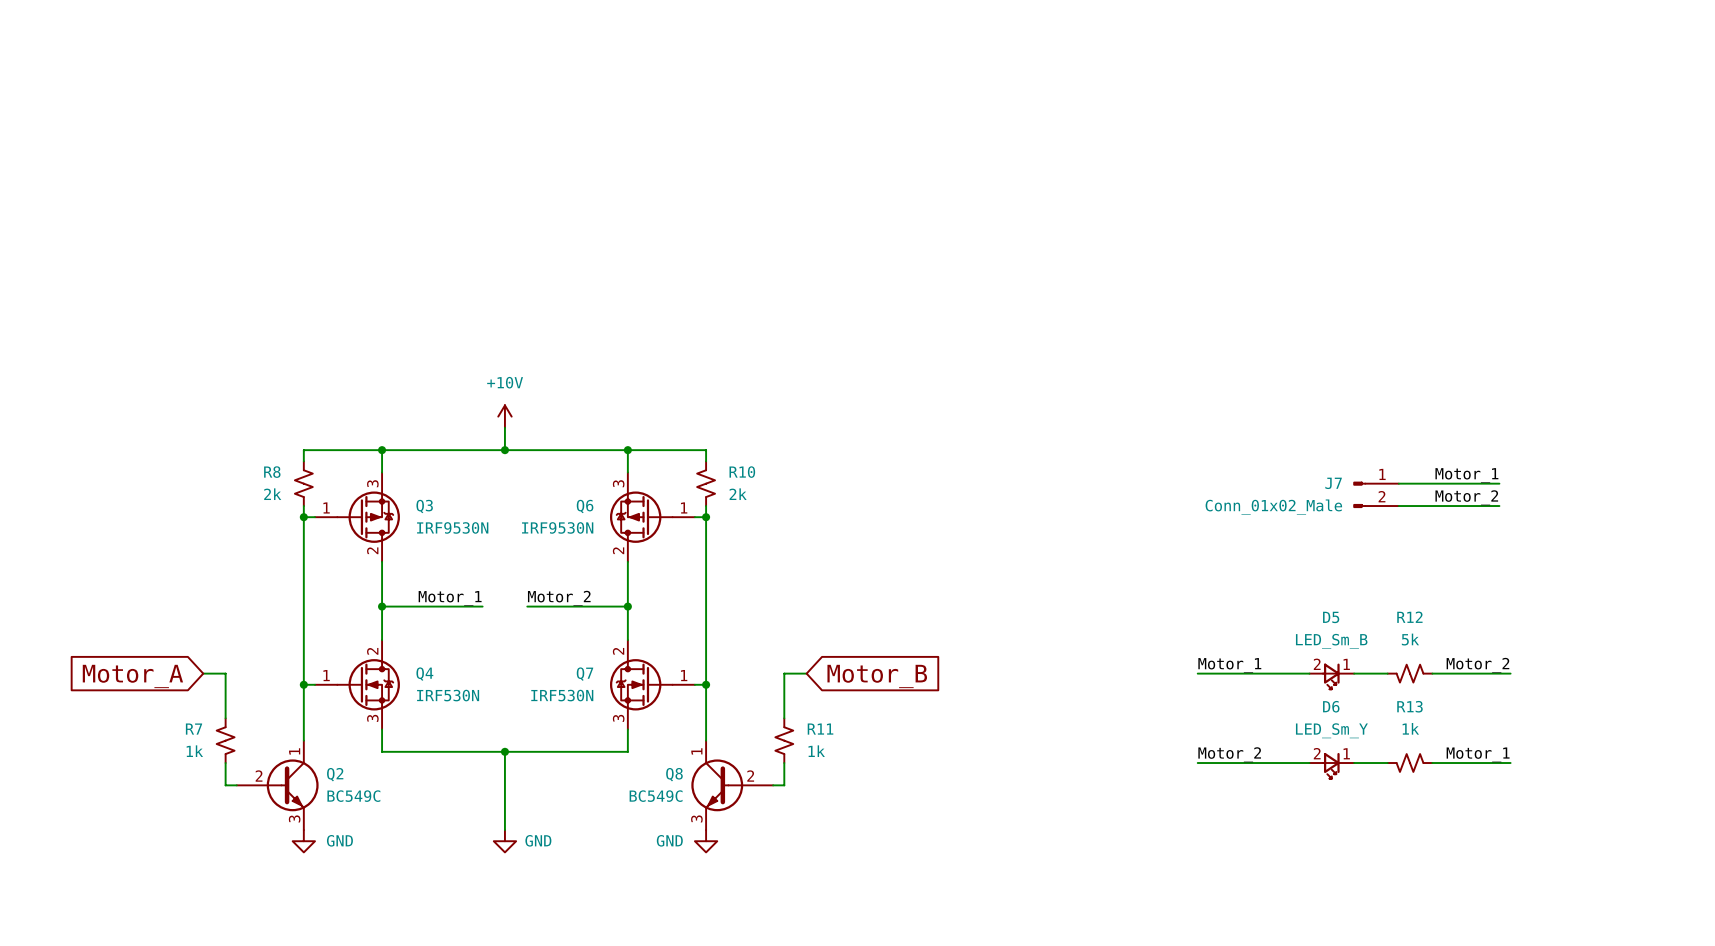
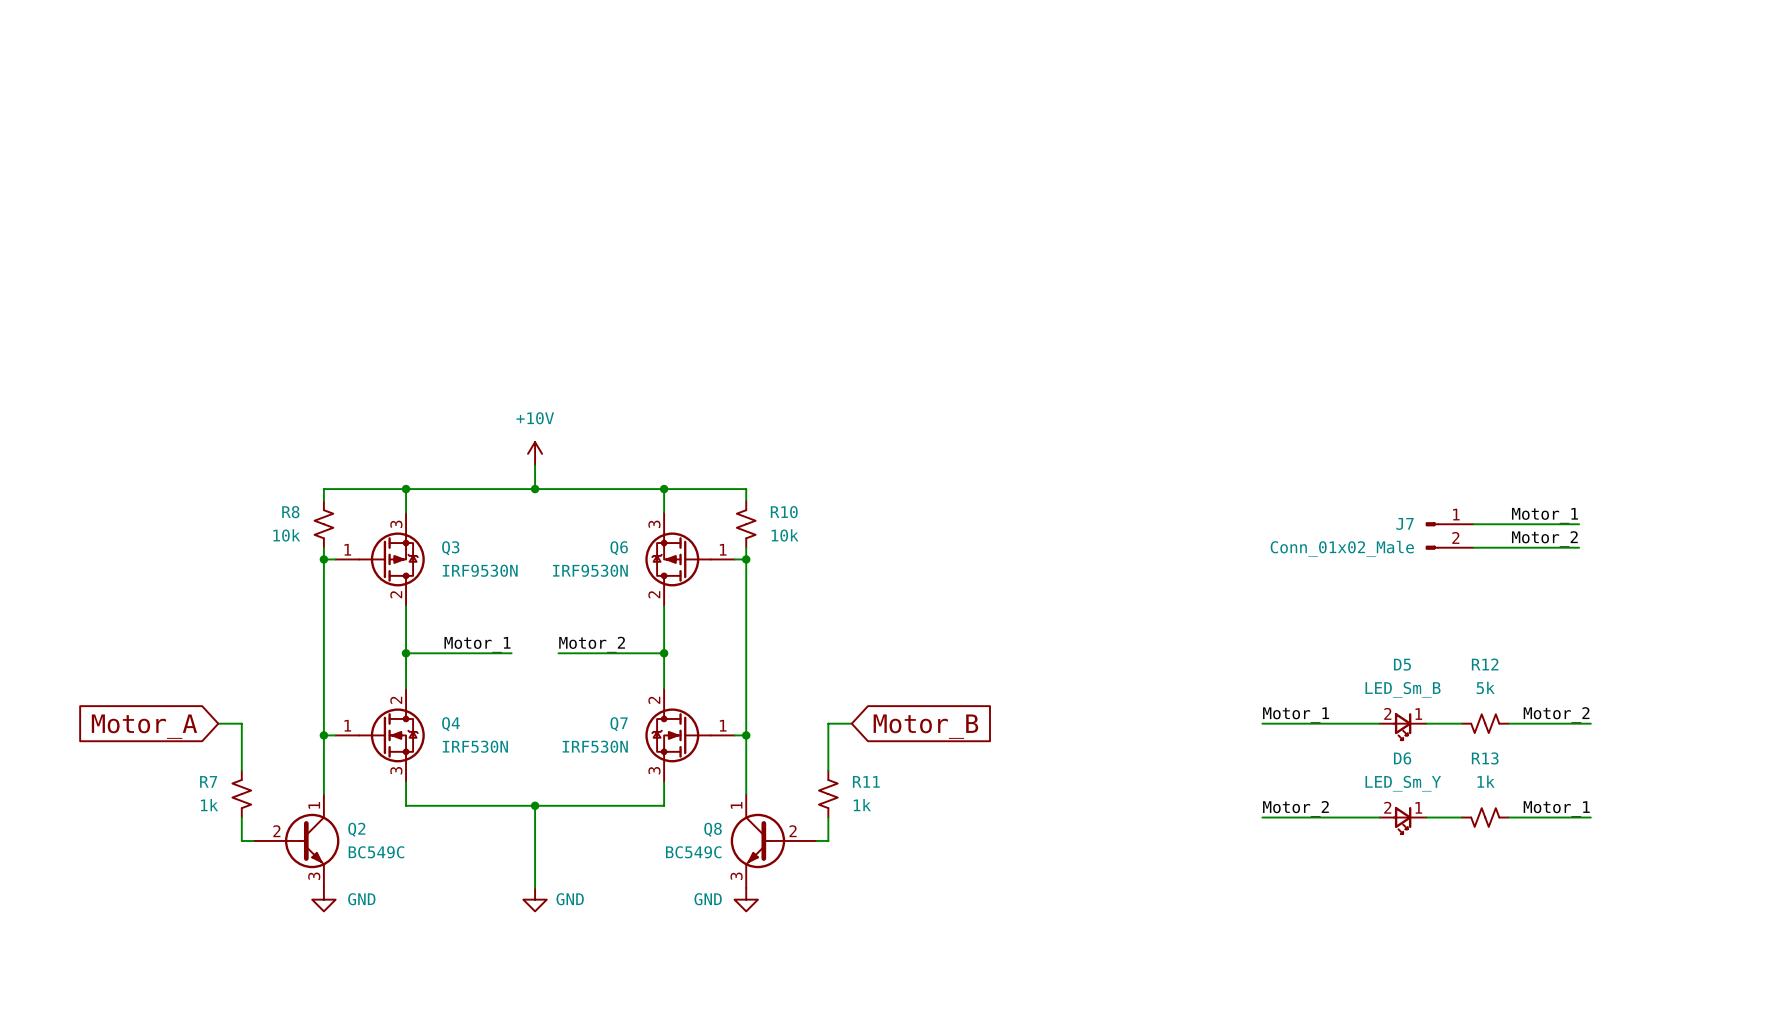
R8 value: 2k (272, 494) -> 10k (286, 535)
R10 value: 2k (738, 494) -> 10k (785, 535)

